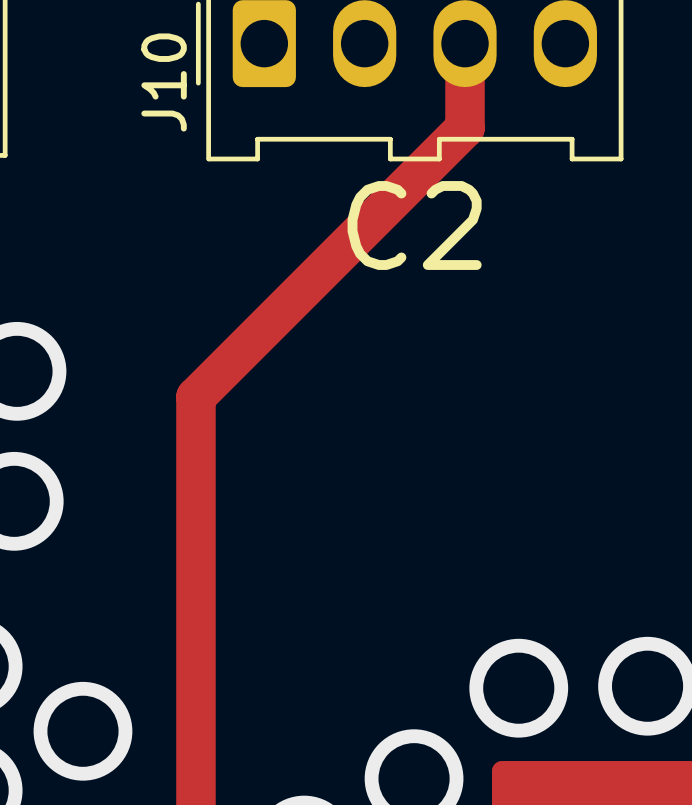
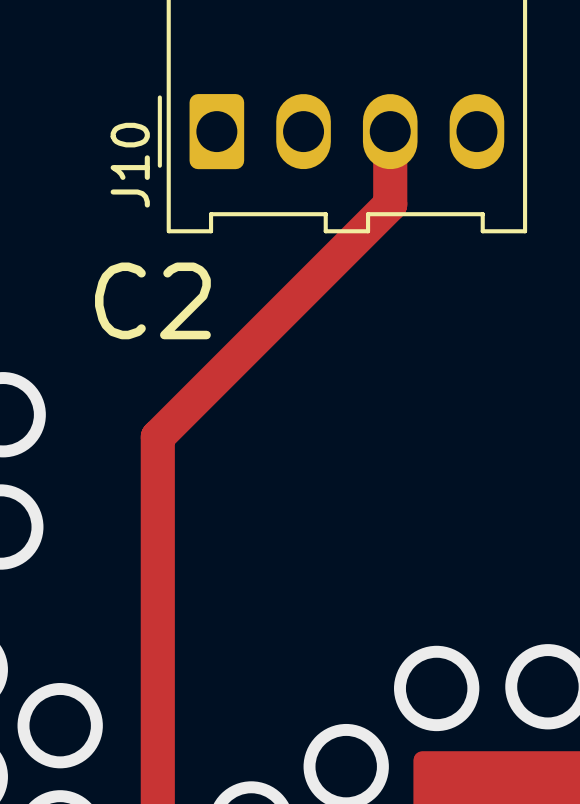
text position: C2 (414, 225) -> C2 (152, 300)

